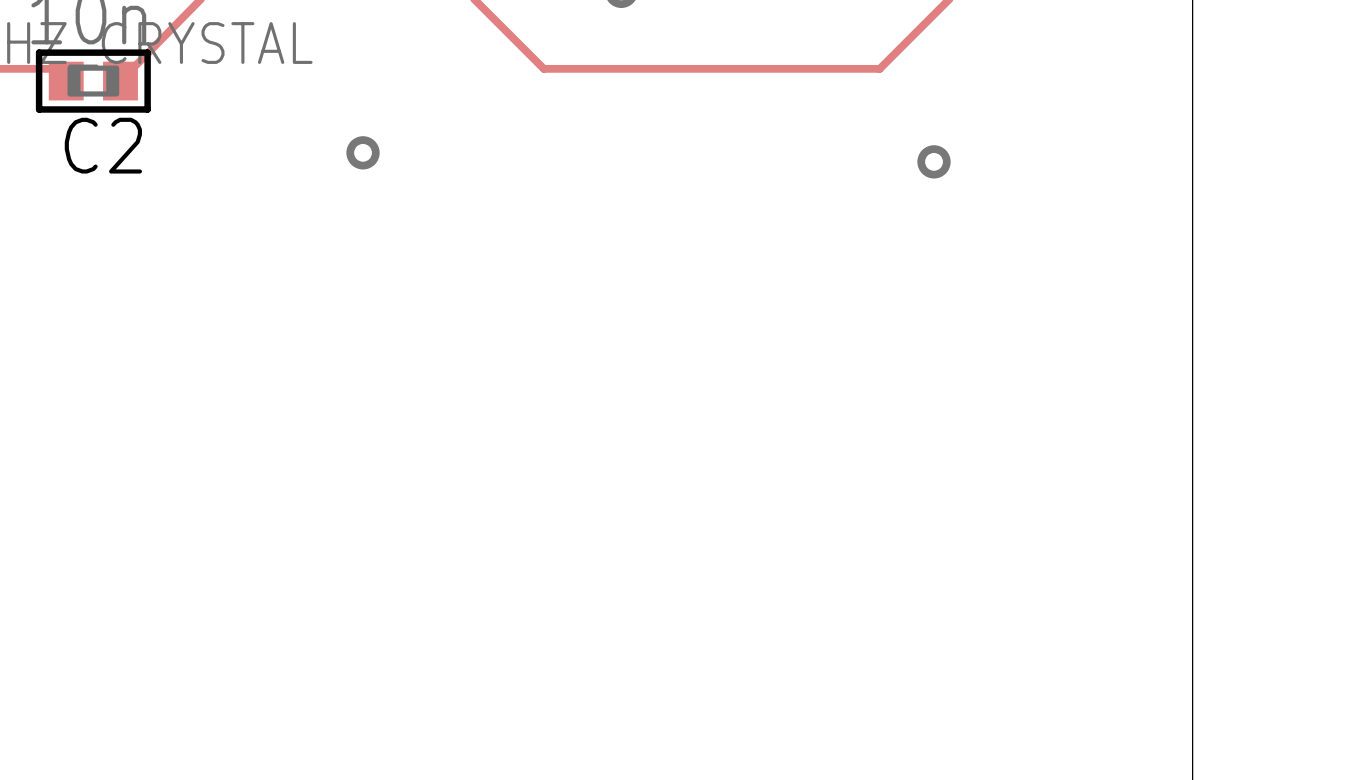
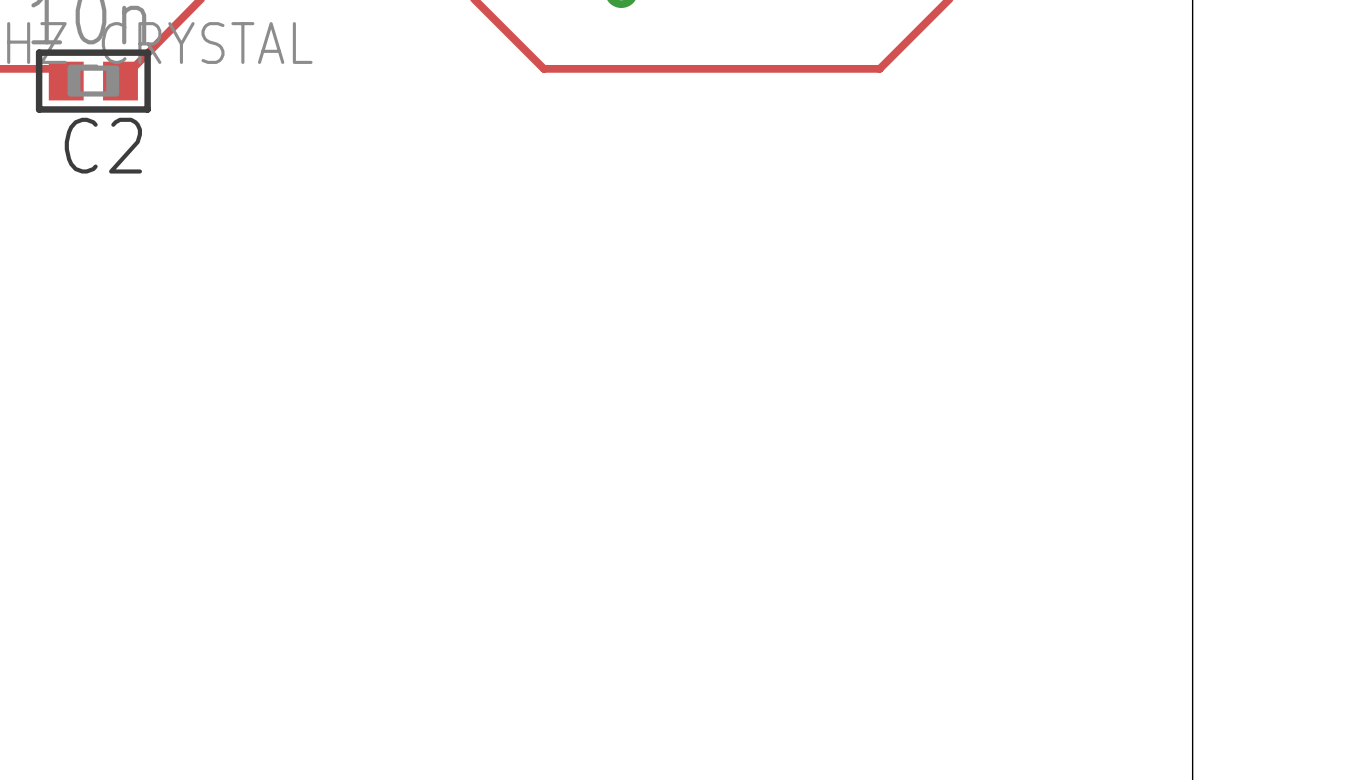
via: (363, 152) -> none
via: (934, 161) -> none

